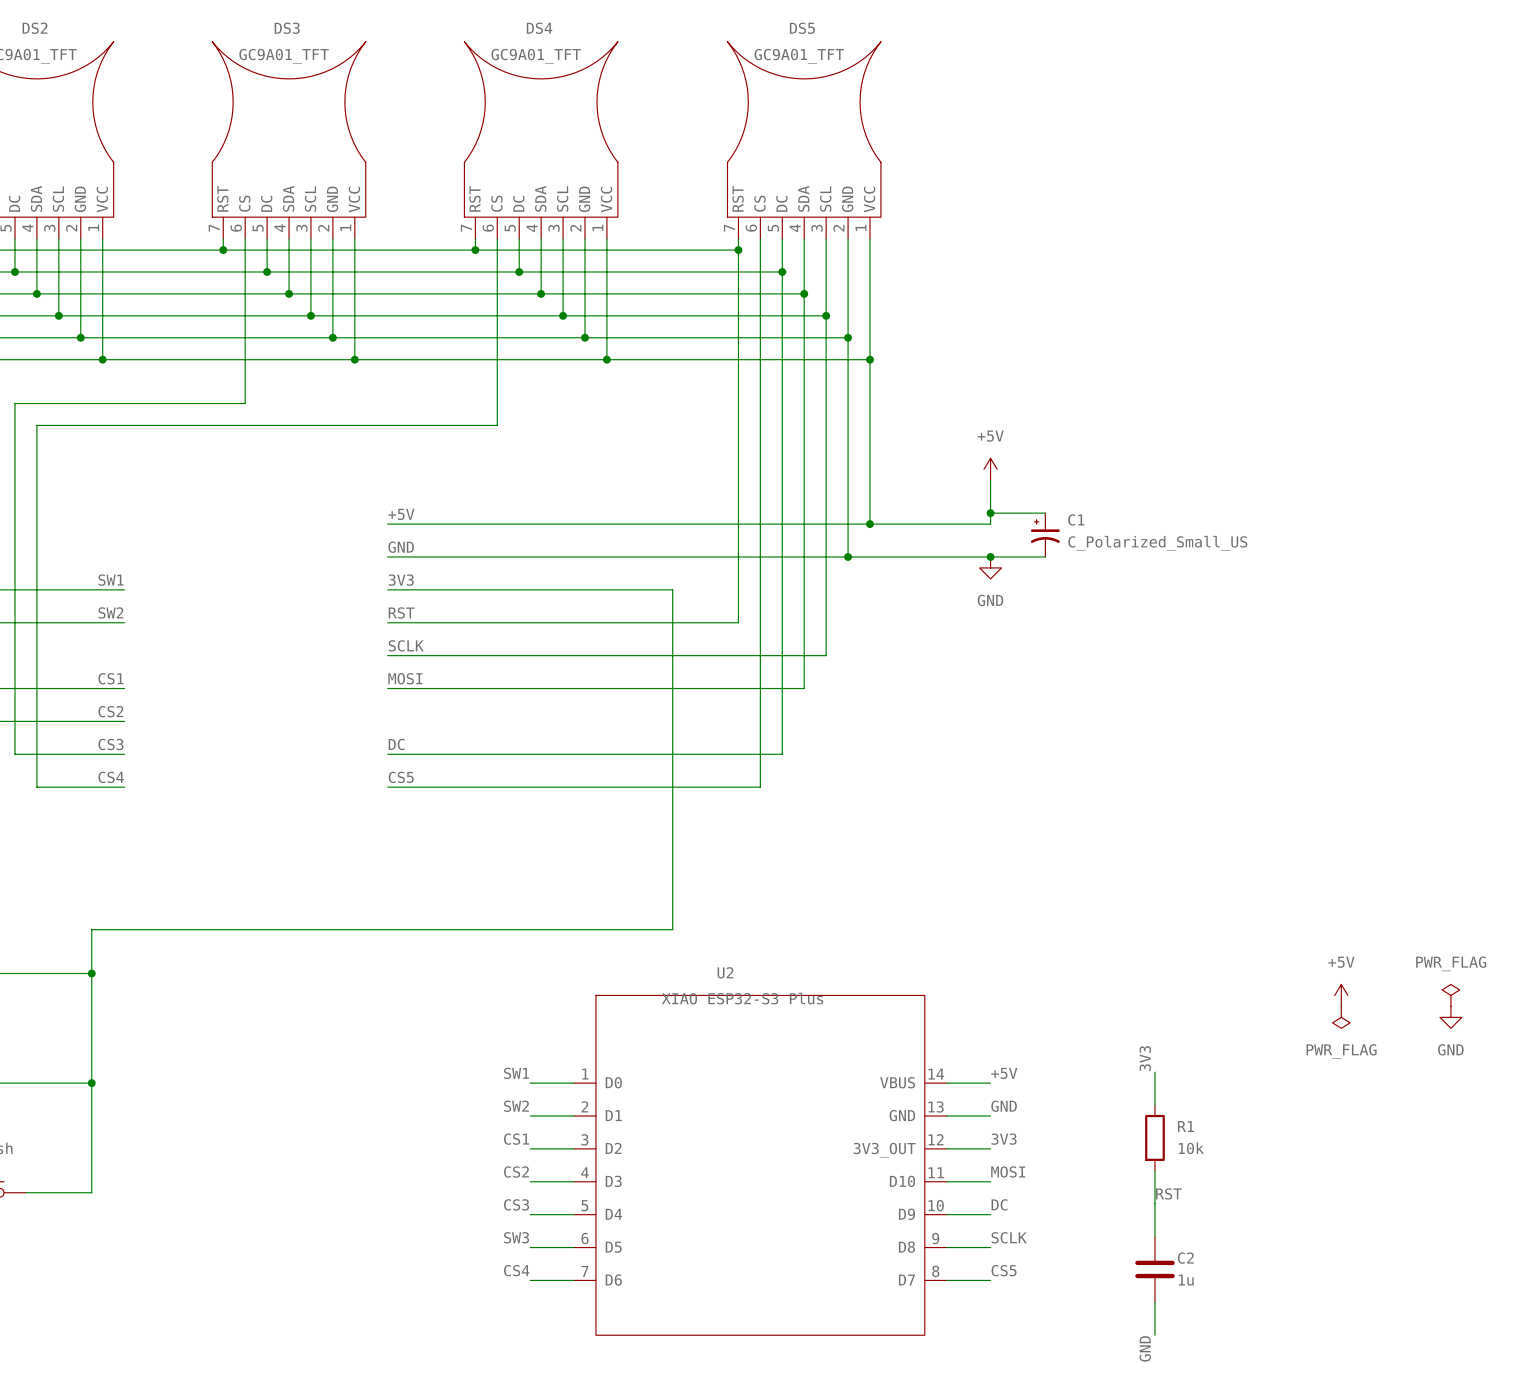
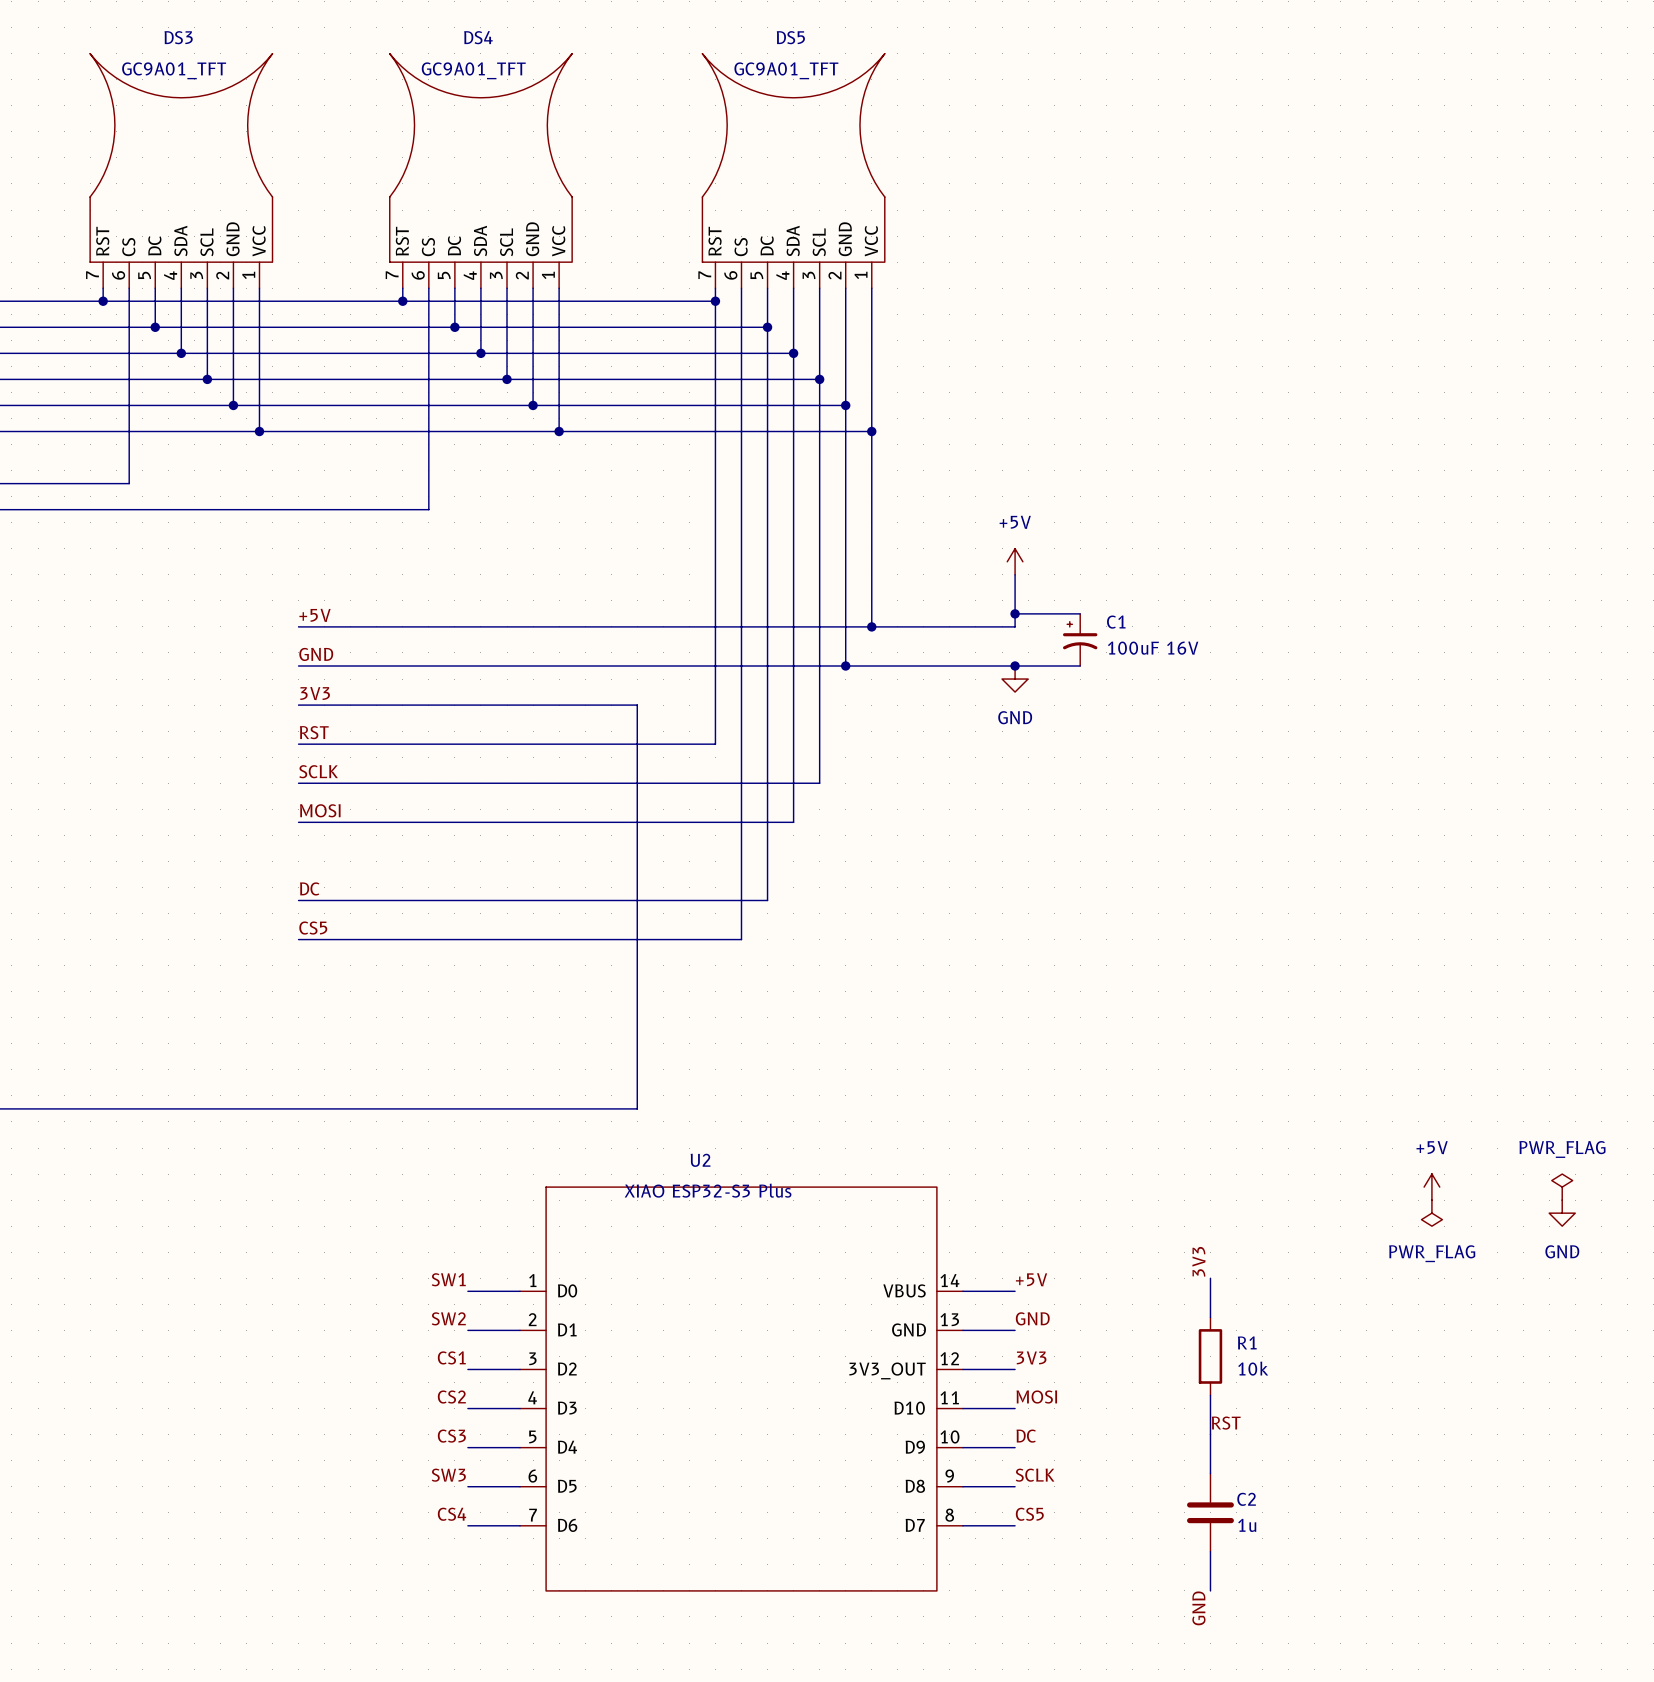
C1 value: C_Polarized_Small_US (1157, 543) -> 100uF 16V (1153, 648)

